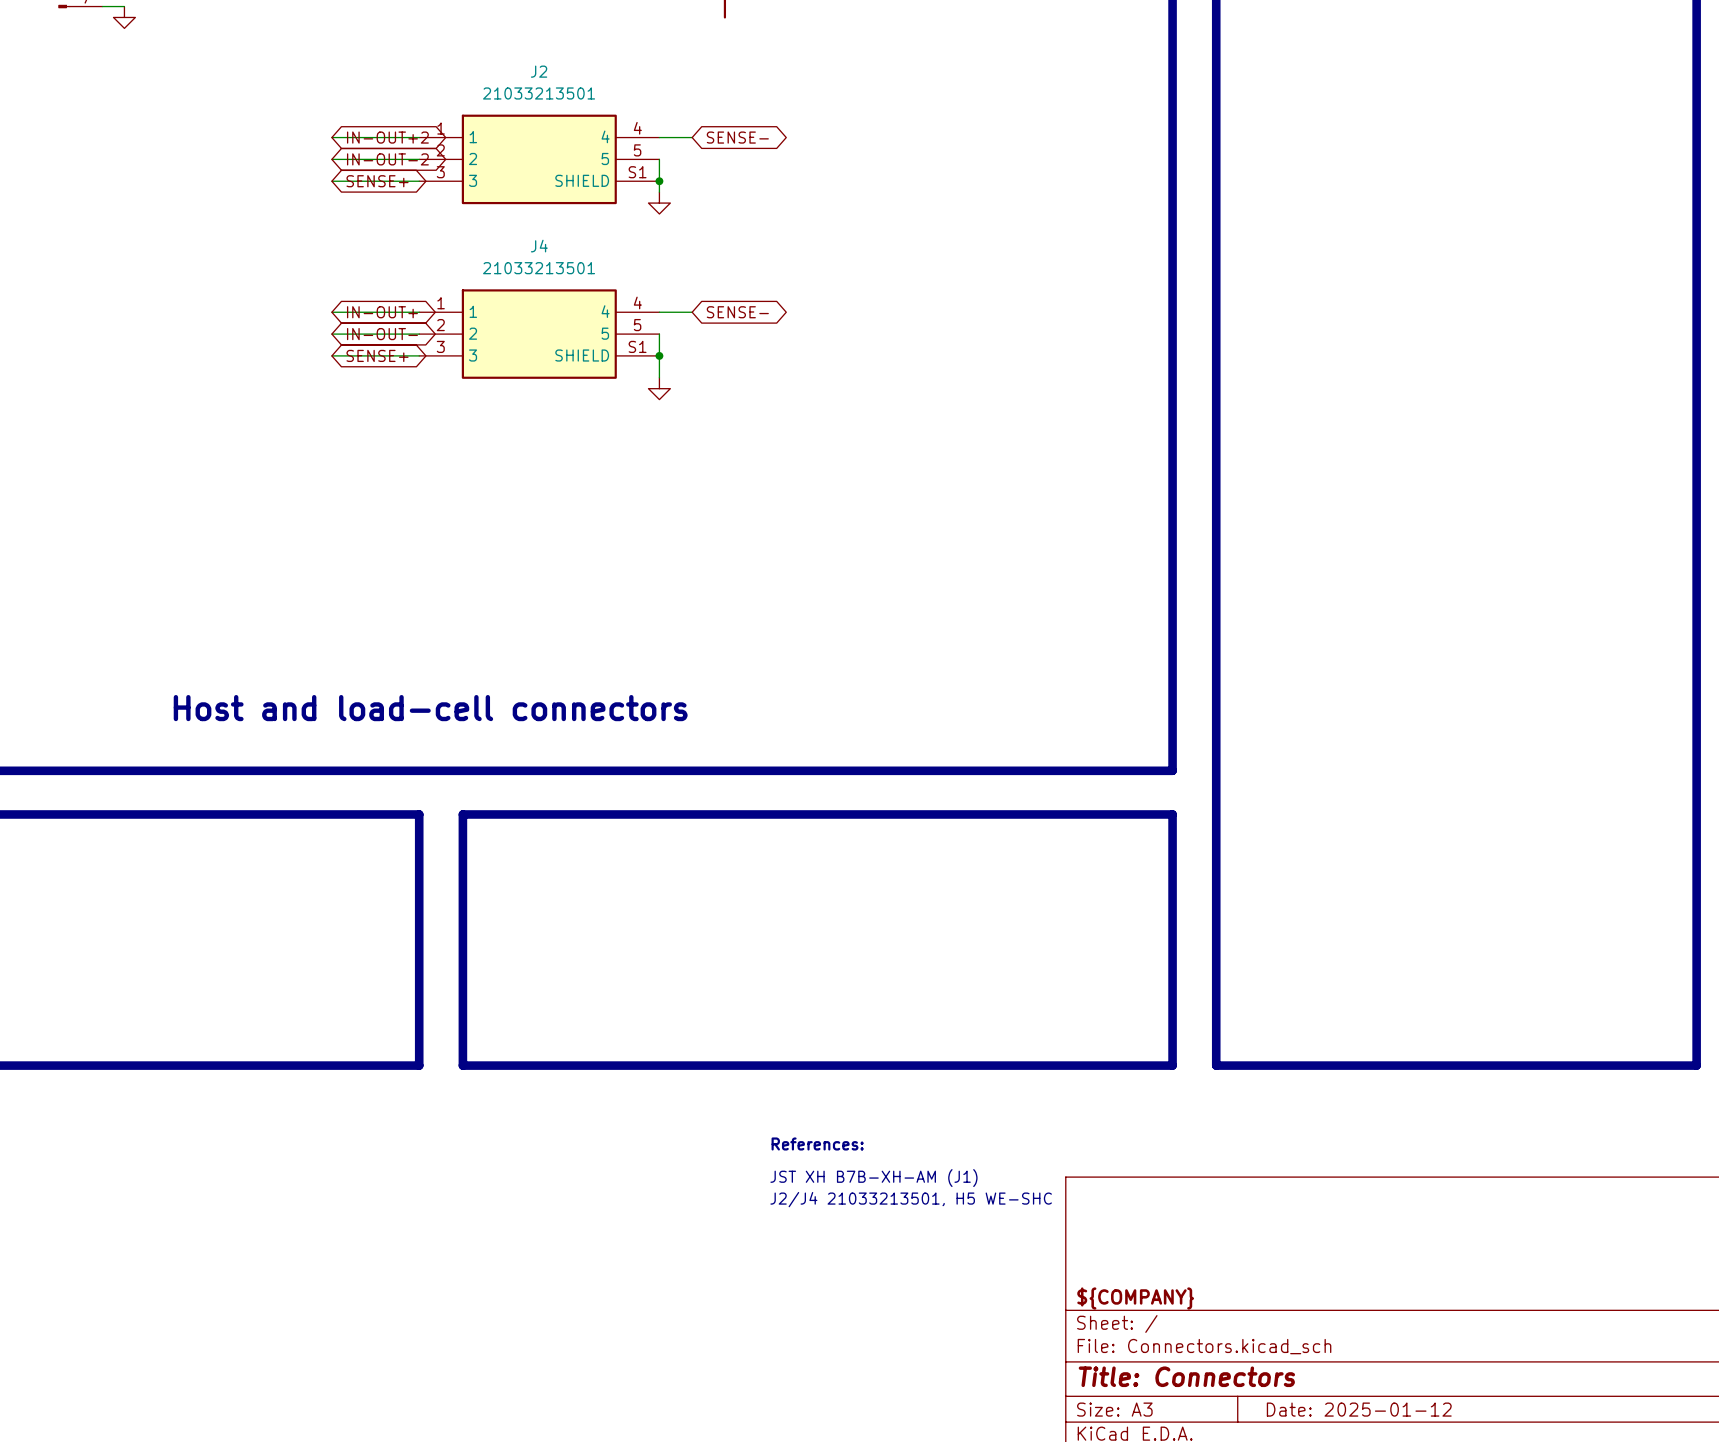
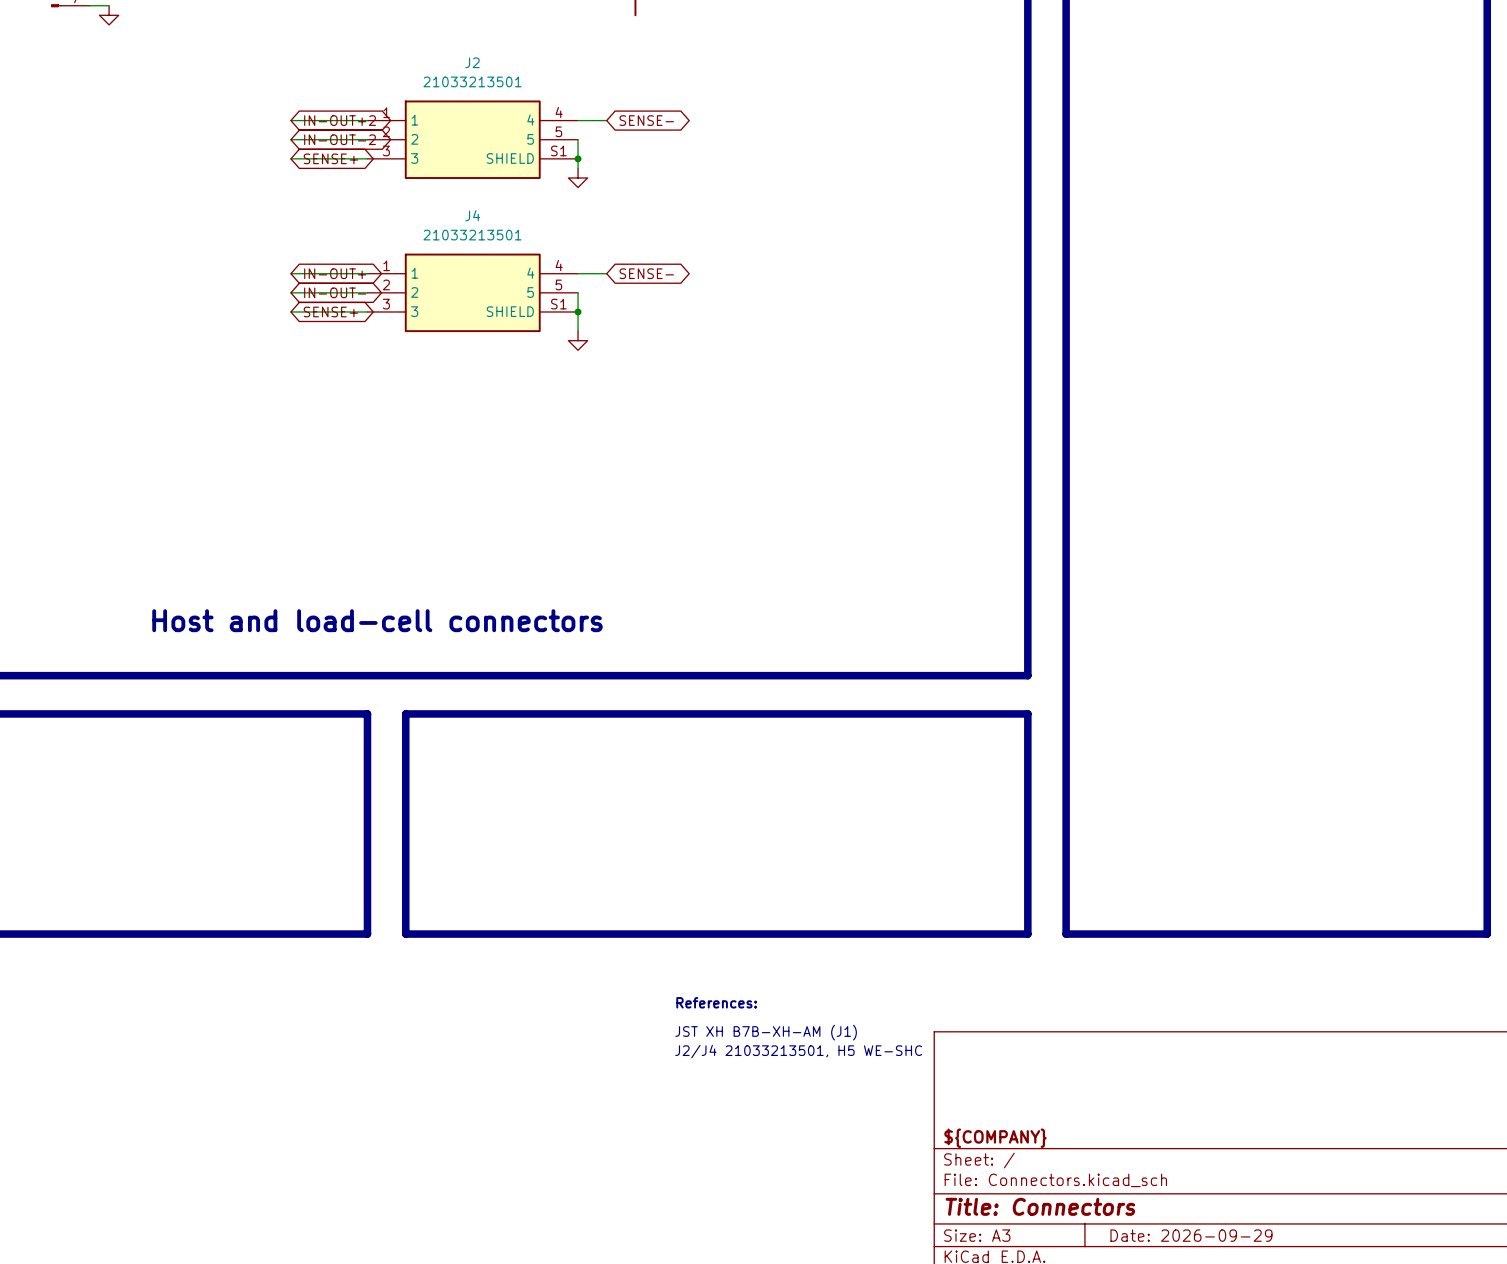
title block: Date: 2025-01-12 (1359, 1409) -> Date: 2026-09-29 (1191, 1235)

